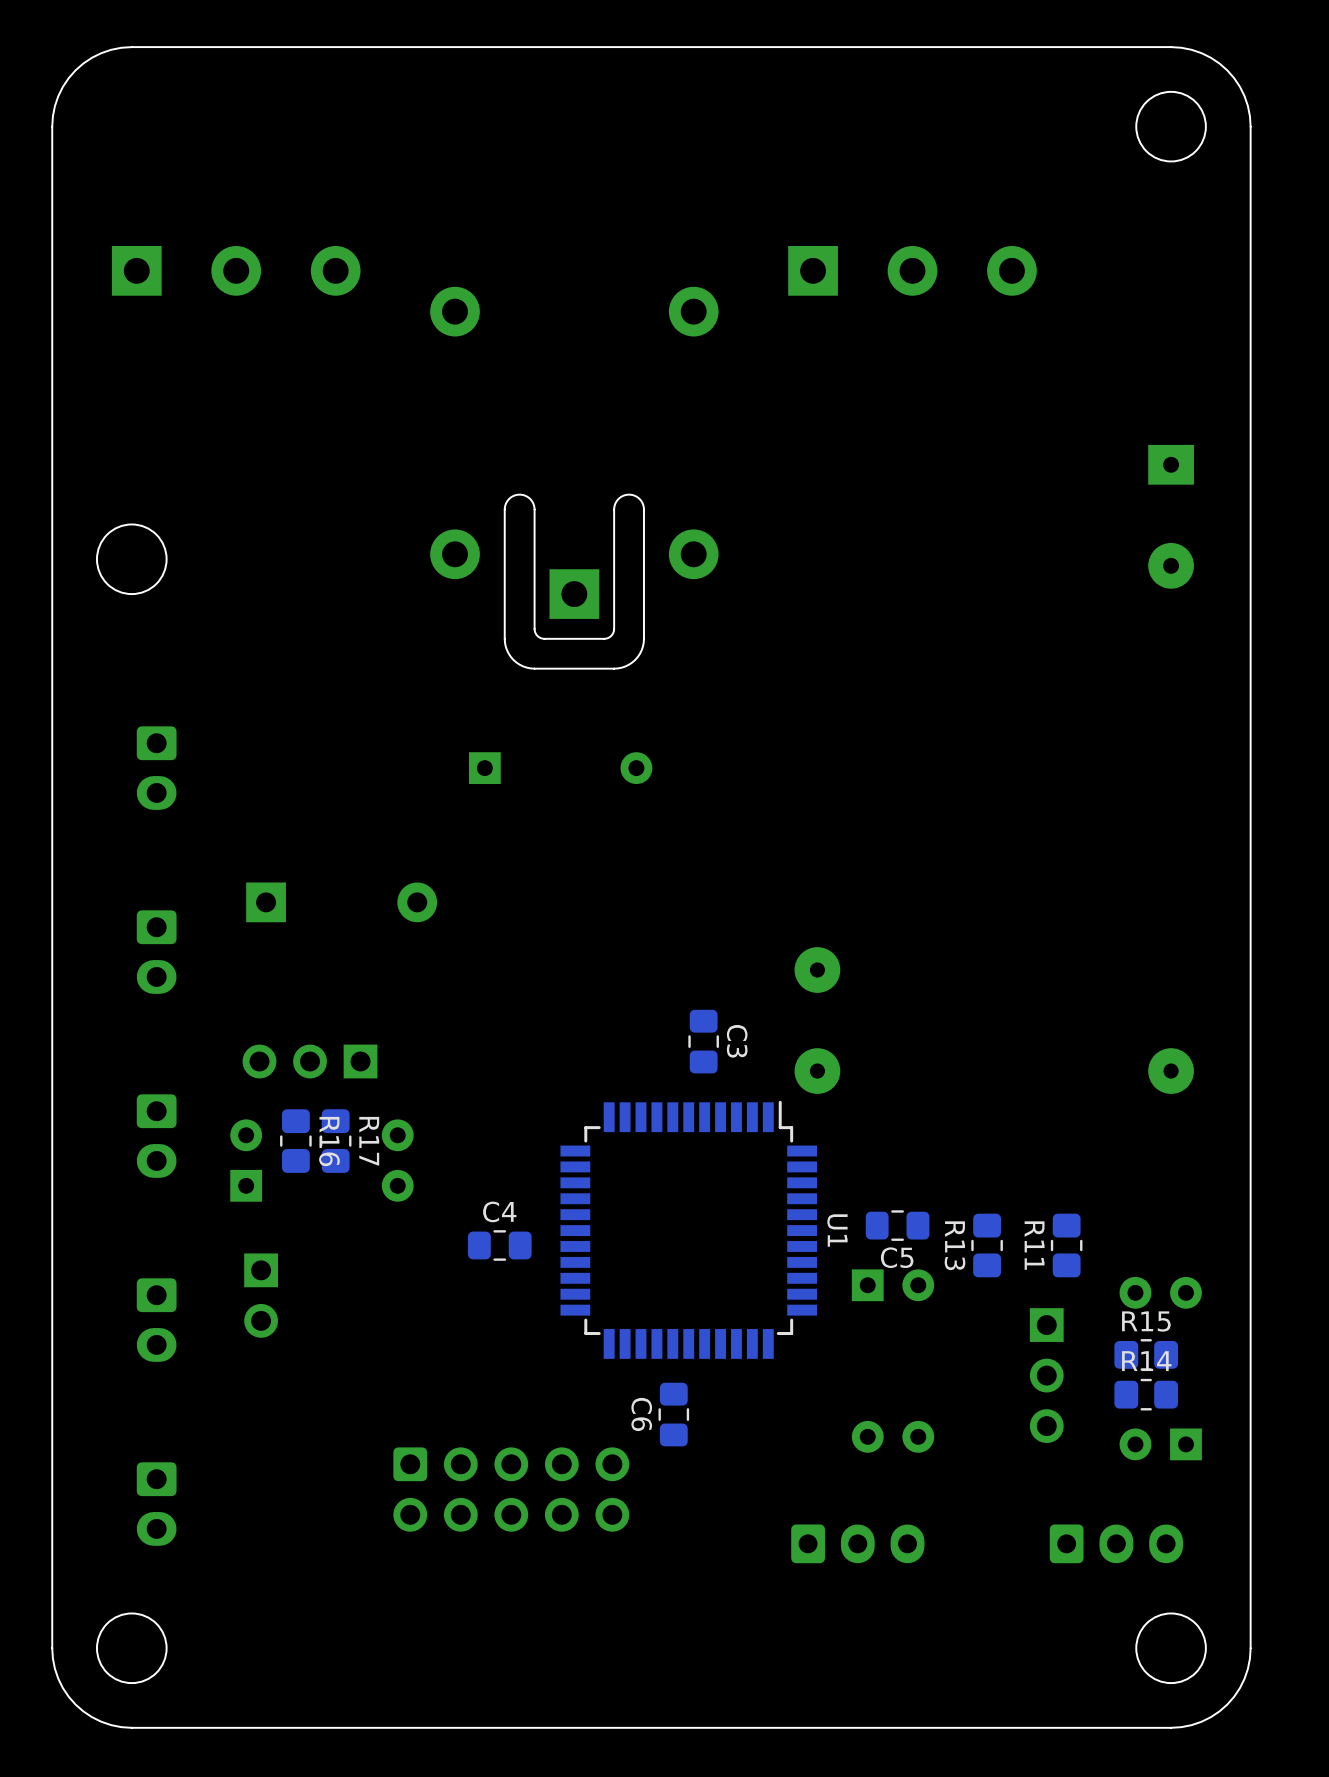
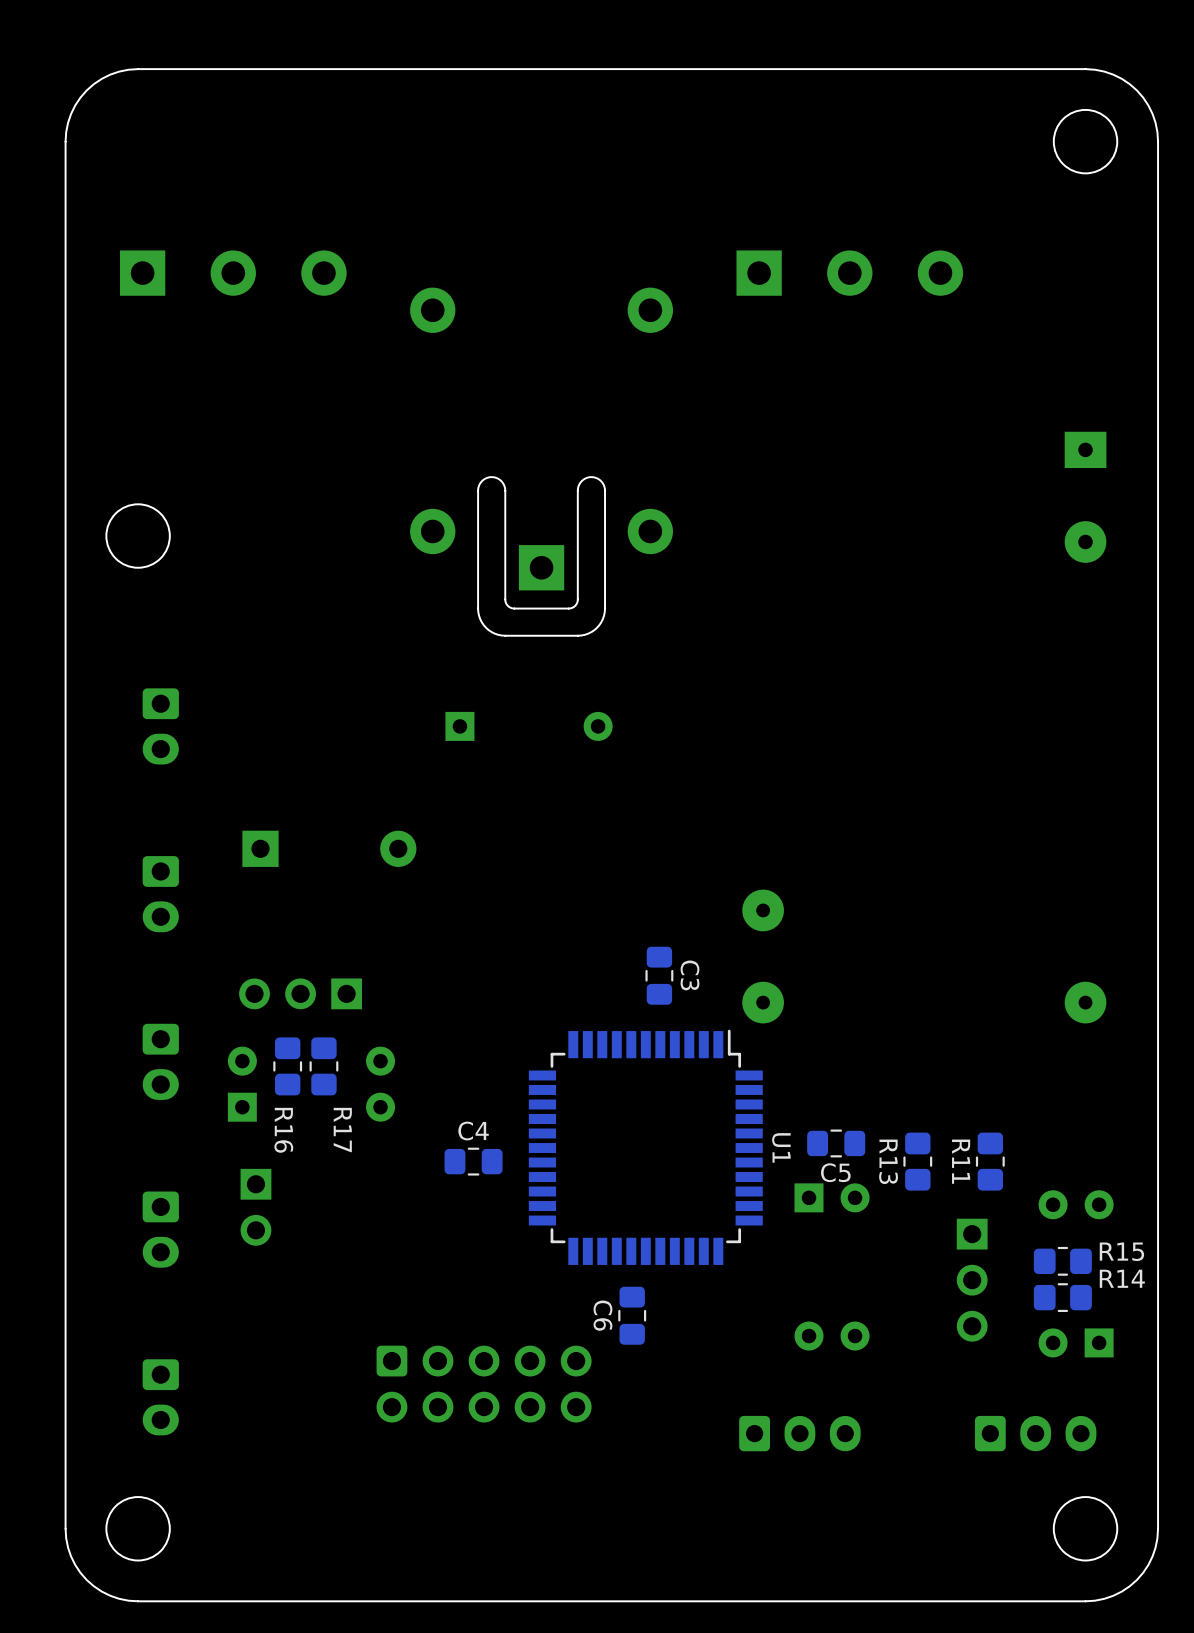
R16 name position: R16 (329, 1141) -> R16 (283, 1130)
R17 name position: R17 (369, 1141) -> R17 (342, 1130)
R15 name position: R15 (1146, 1321) -> R15 (1121, 1251)
R14 name position: R14 (1146, 1361) -> R14 (1122, 1278)

